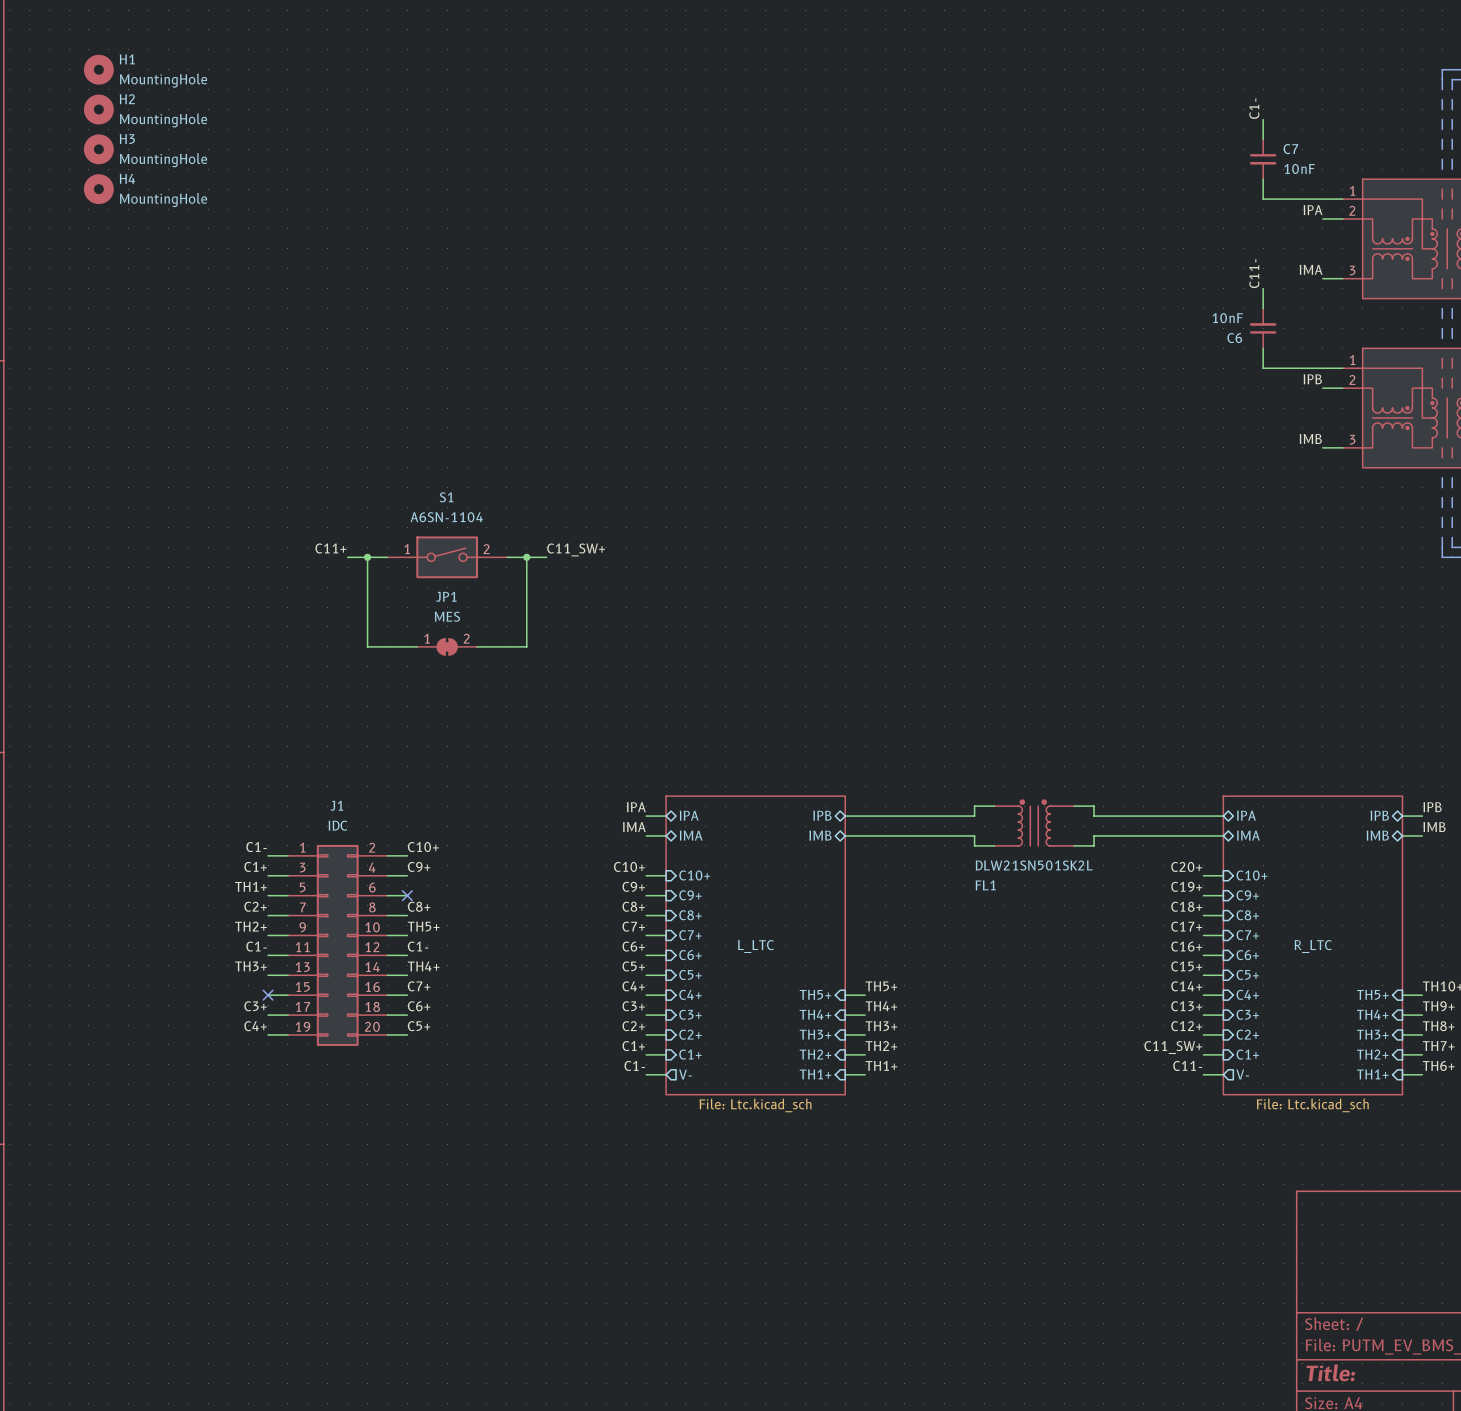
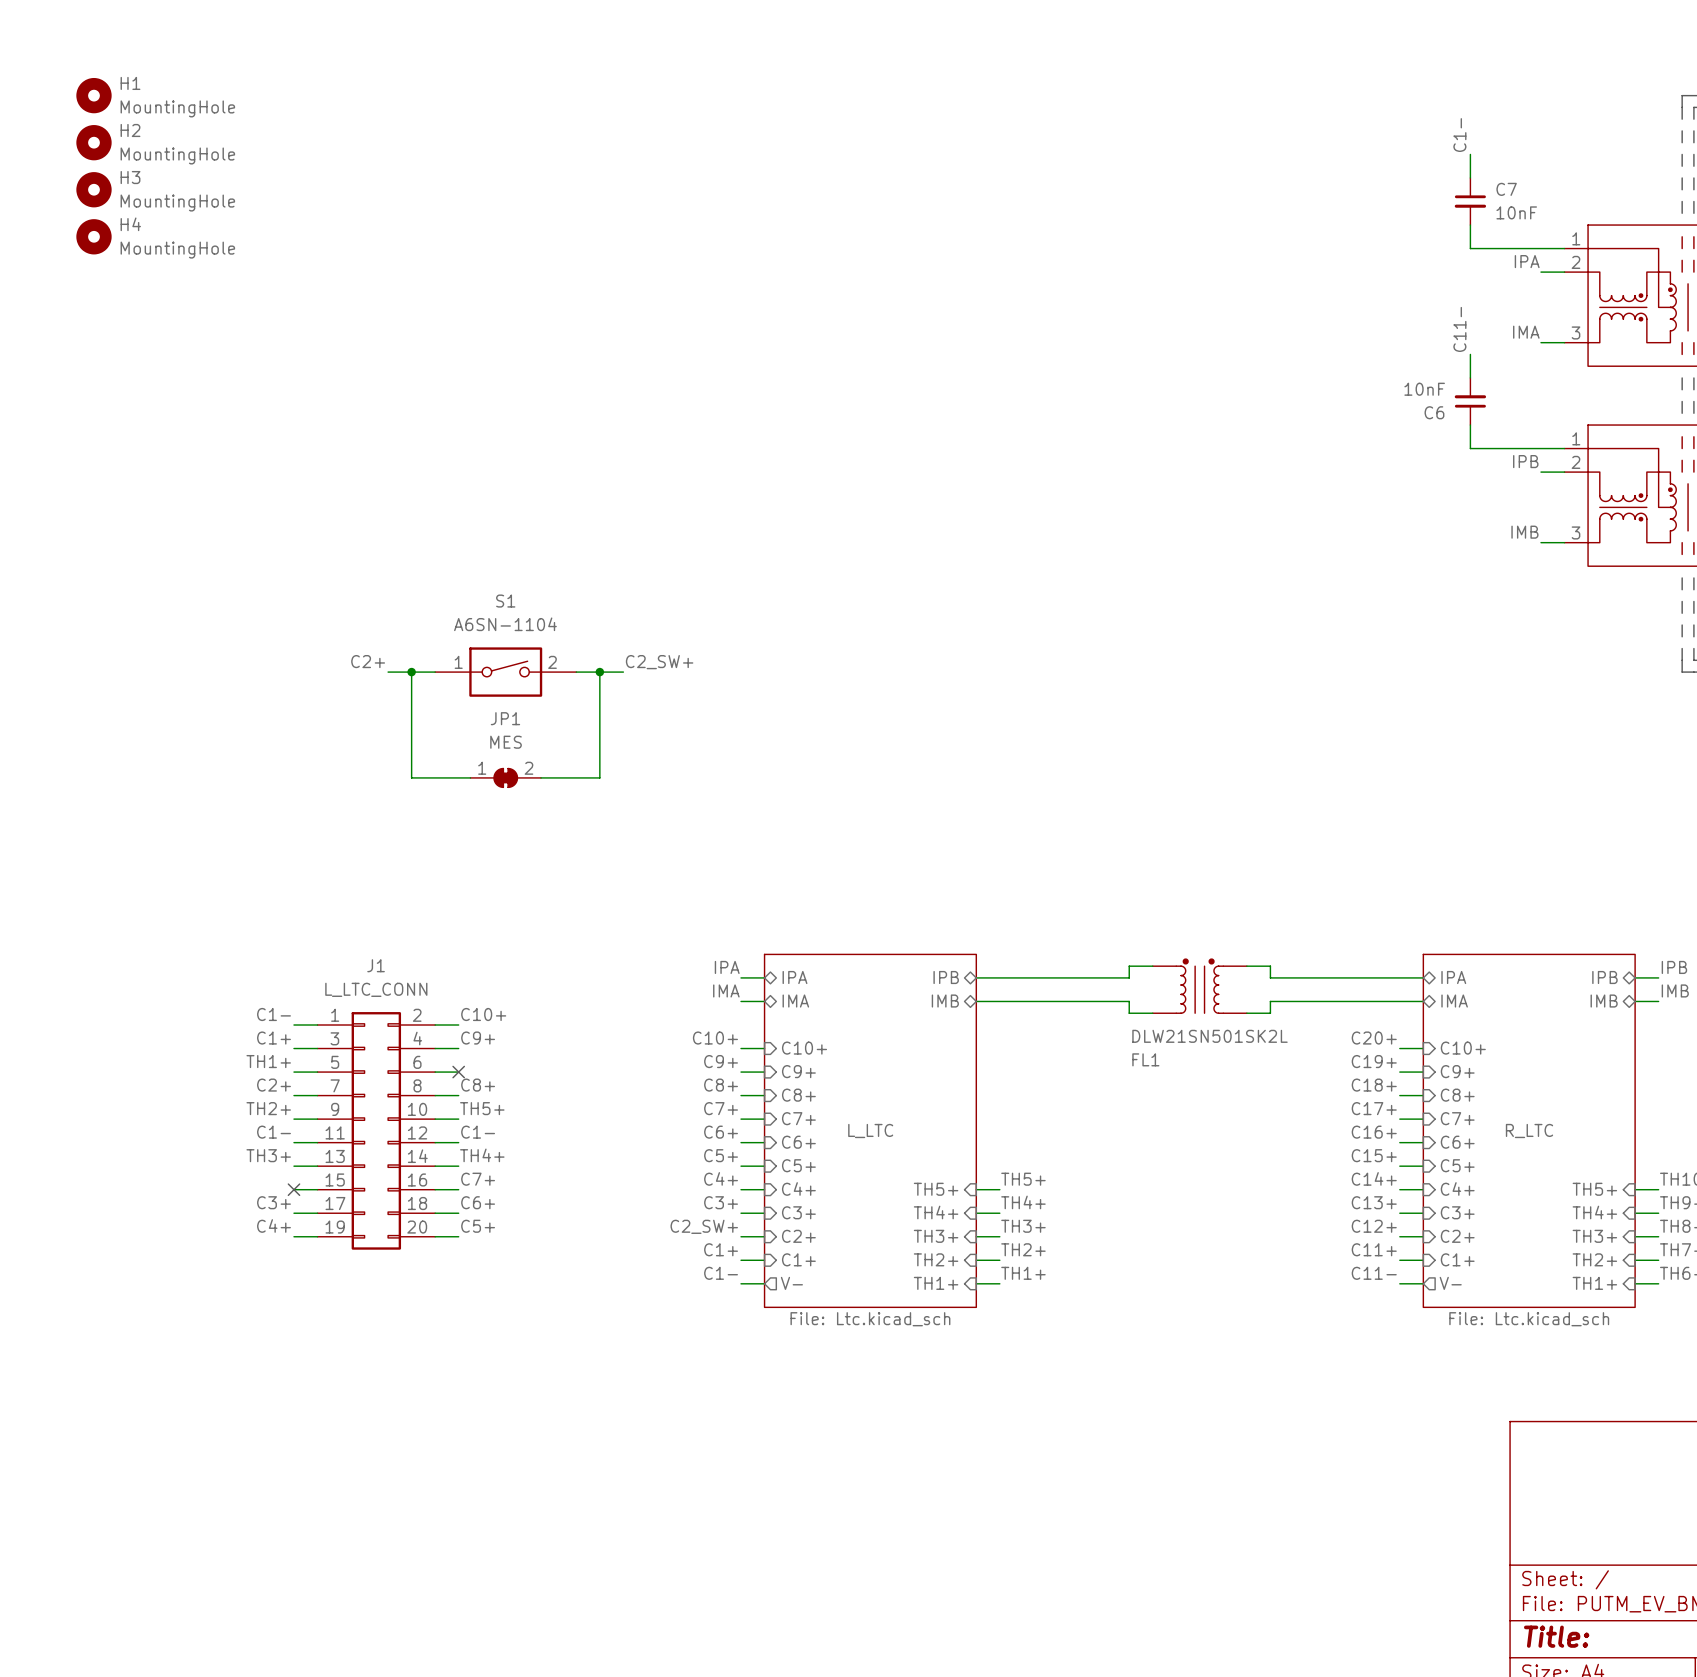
label: C11+ (330, 548) -> C2+ (368, 661)
label: C11_SW+ (576, 549) -> C2_SW+ (659, 662)
J1 value: IDC (337, 825) -> L_LTC_CONN (376, 989)
label: C2+ (633, 1026) -> C2_SW+ (704, 1226)
label: C11_SW+ (1173, 1047) -> C11+ (1374, 1249)

